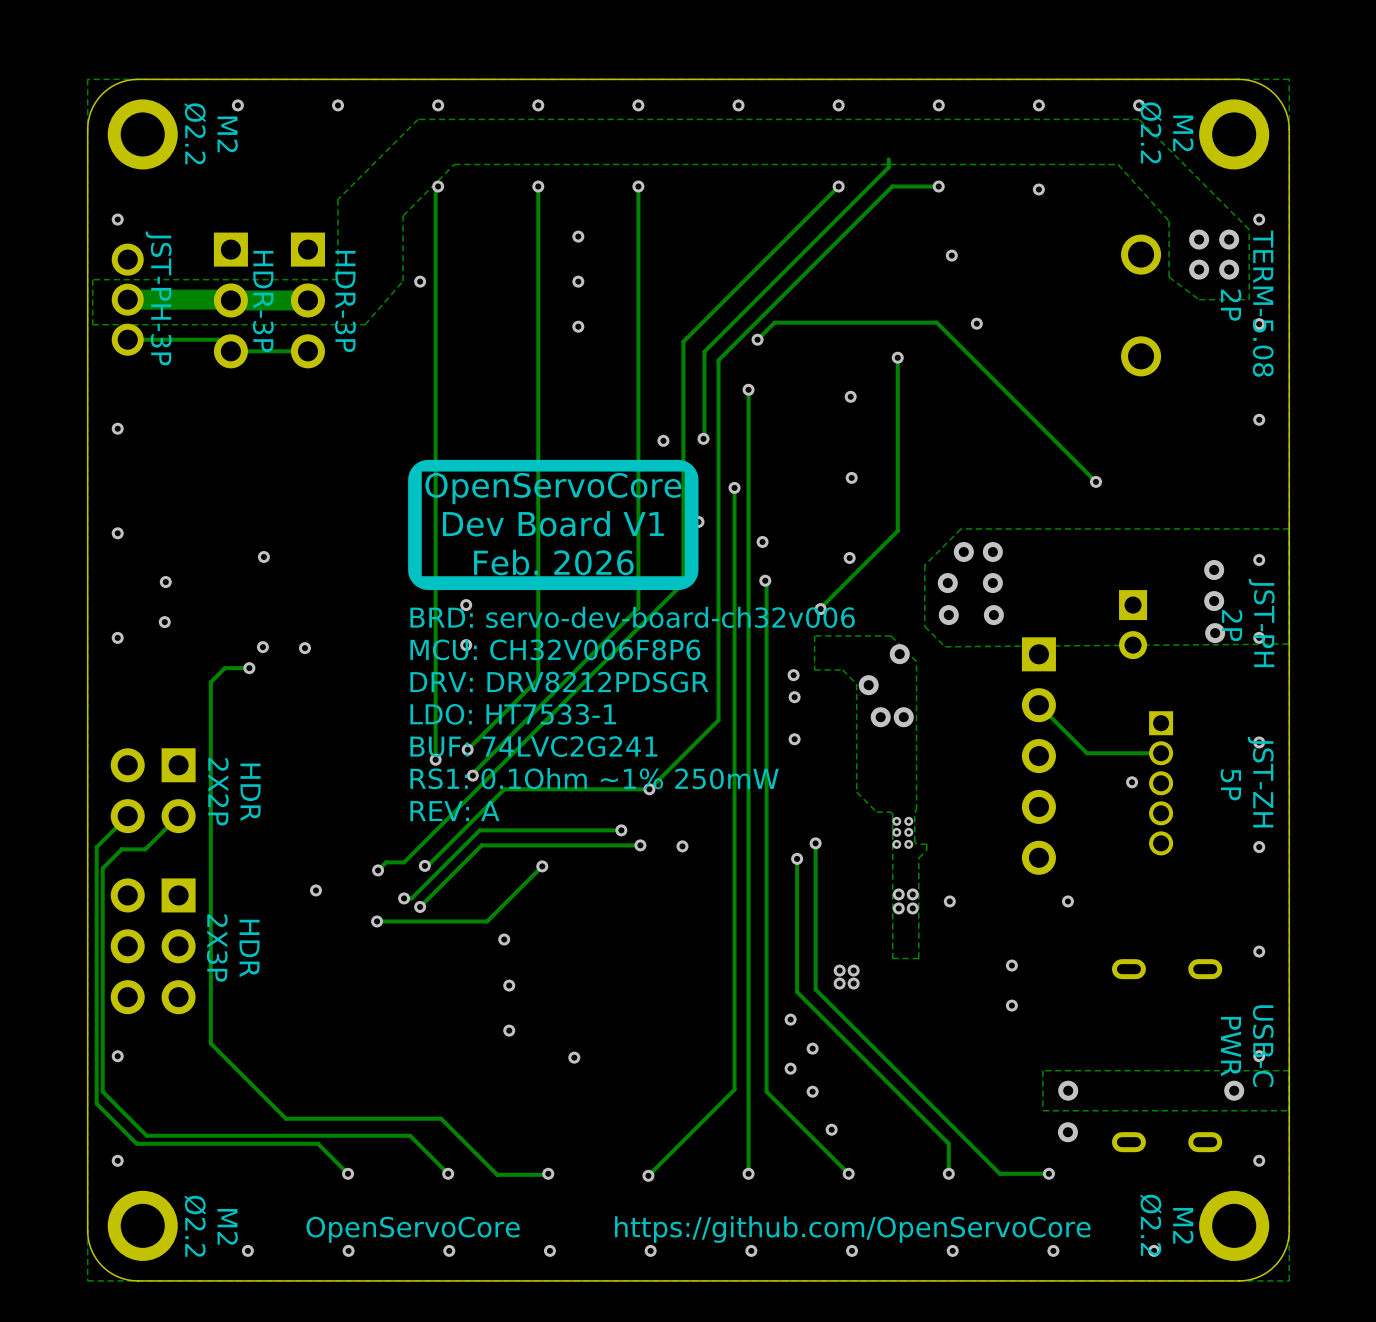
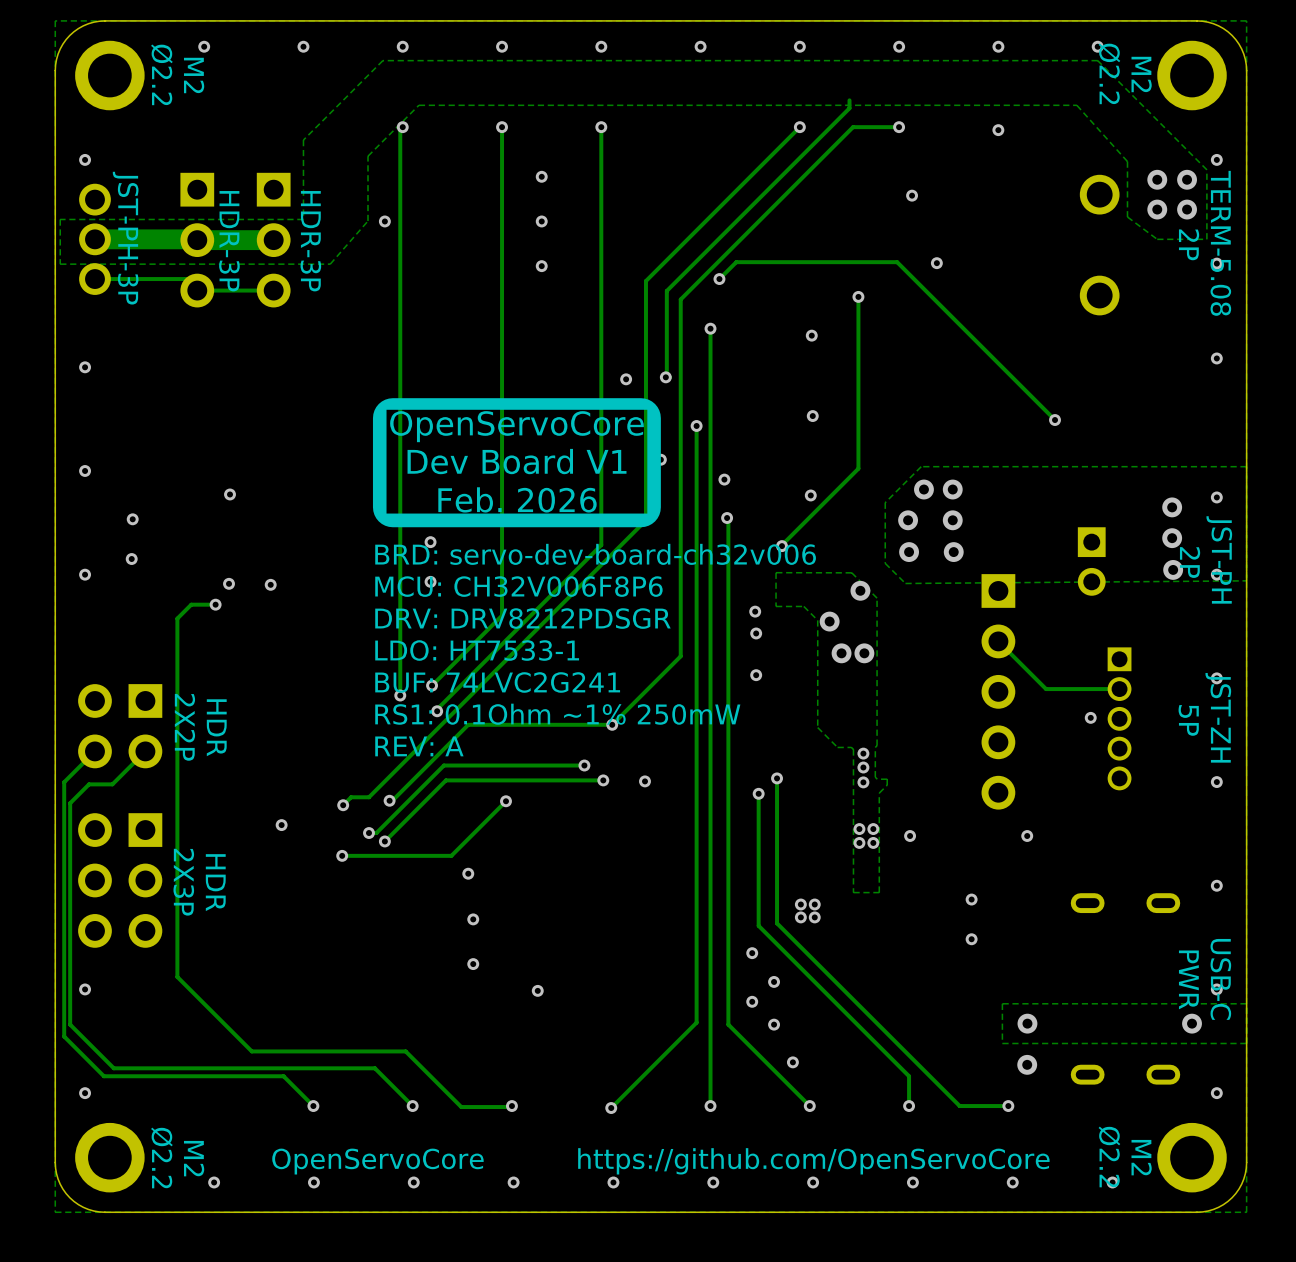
via: none -> (863, 753)
via: (896, 821) -> none
via: (908, 821) -> none
via: (896, 832) -> none
via: none -> (863, 767)
via: (908, 832) -> none
via: (896, 844) -> none
via: (908, 844) -> none
via: none -> (863, 782)

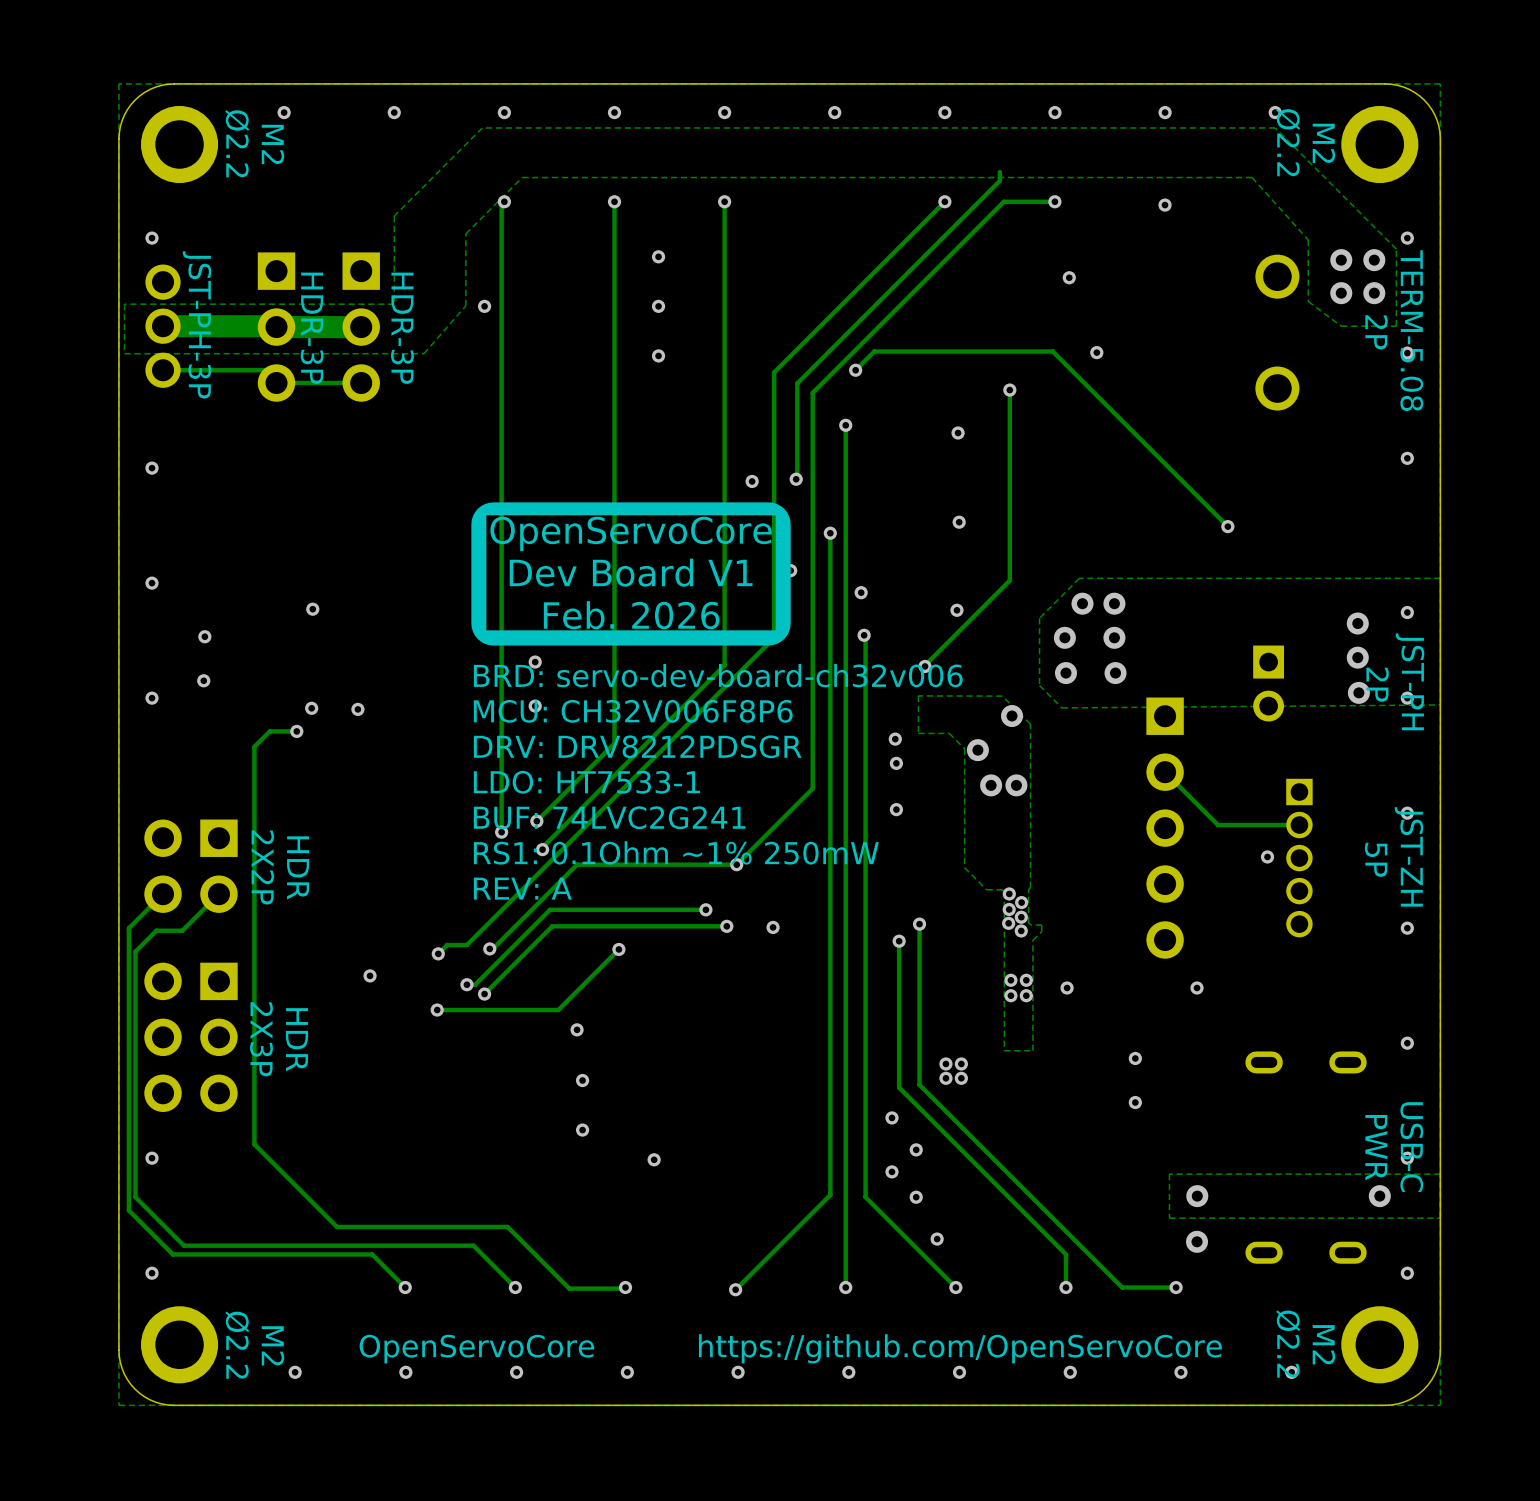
via: none -> (1009, 893)
via: (863, 753) -> none
via: none -> (1021, 902)
via: none -> (1009, 909)
via: (863, 767) -> none
via: none -> (1021, 917)
via: none -> (1008, 923)
via: (863, 782) -> none
via: none -> (1021, 930)

